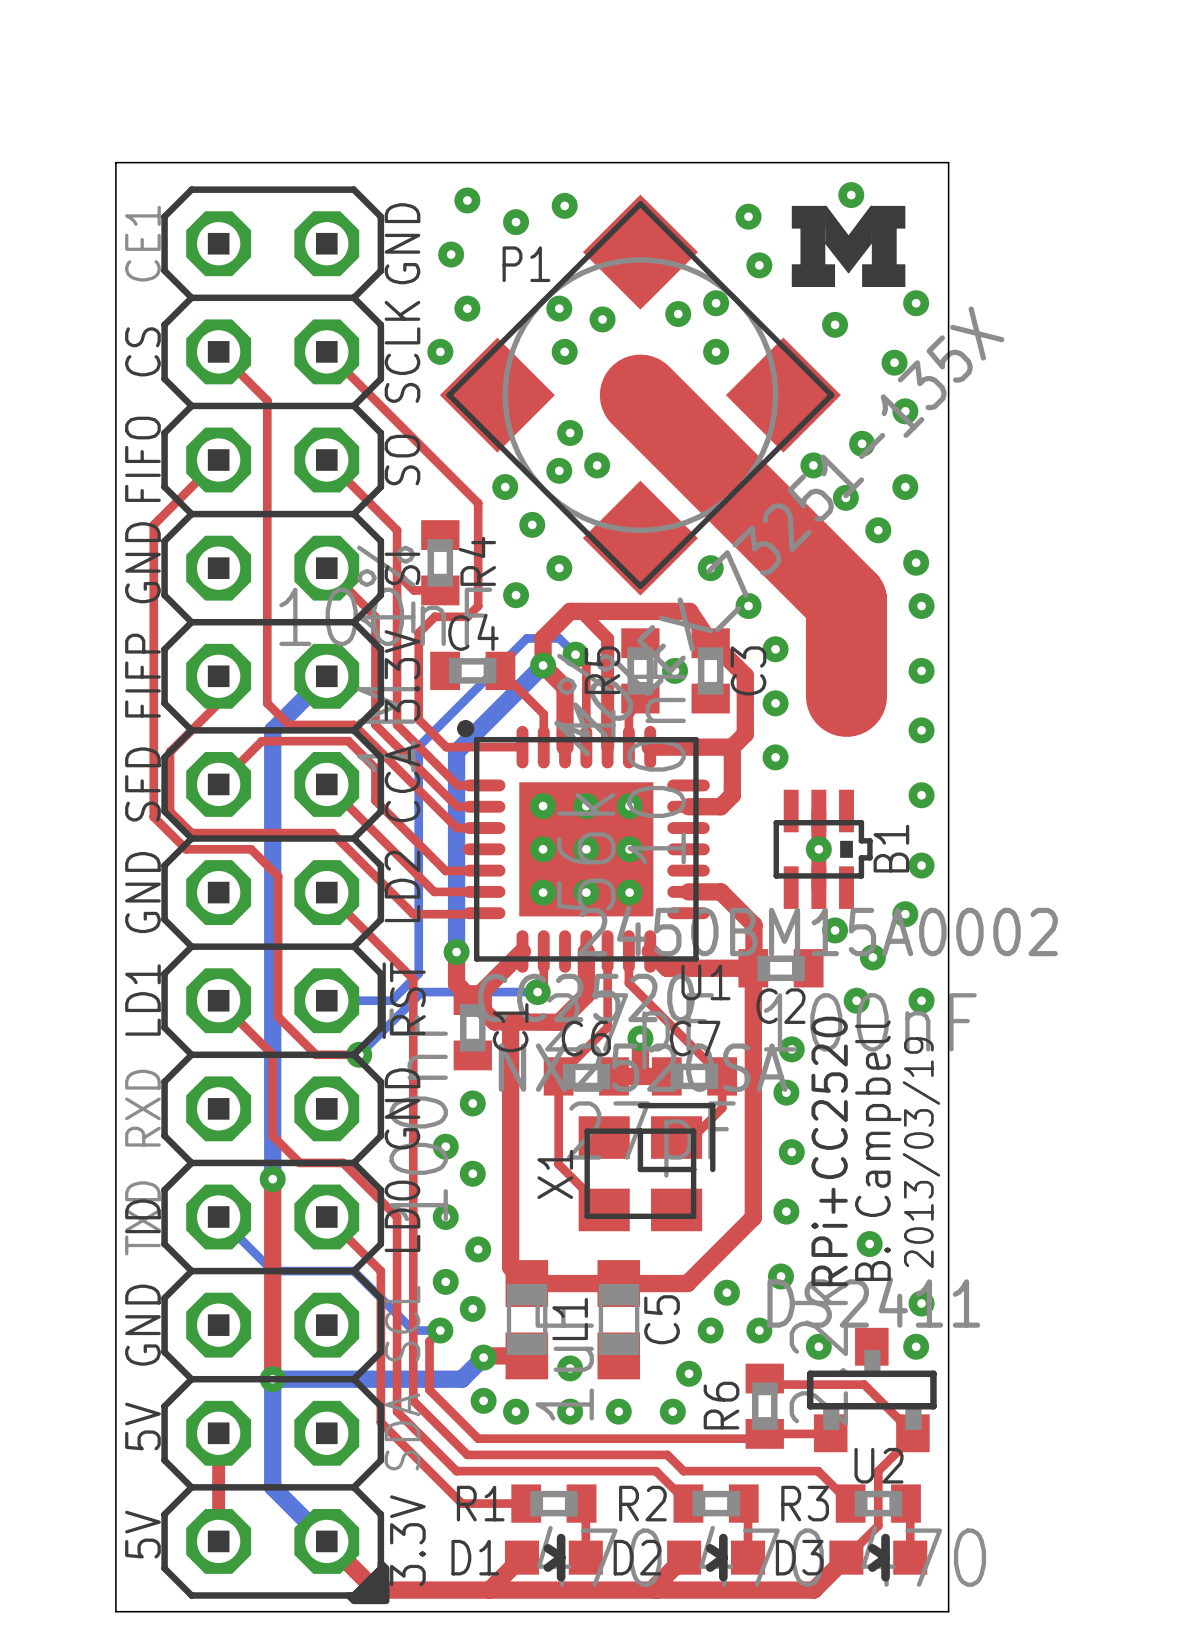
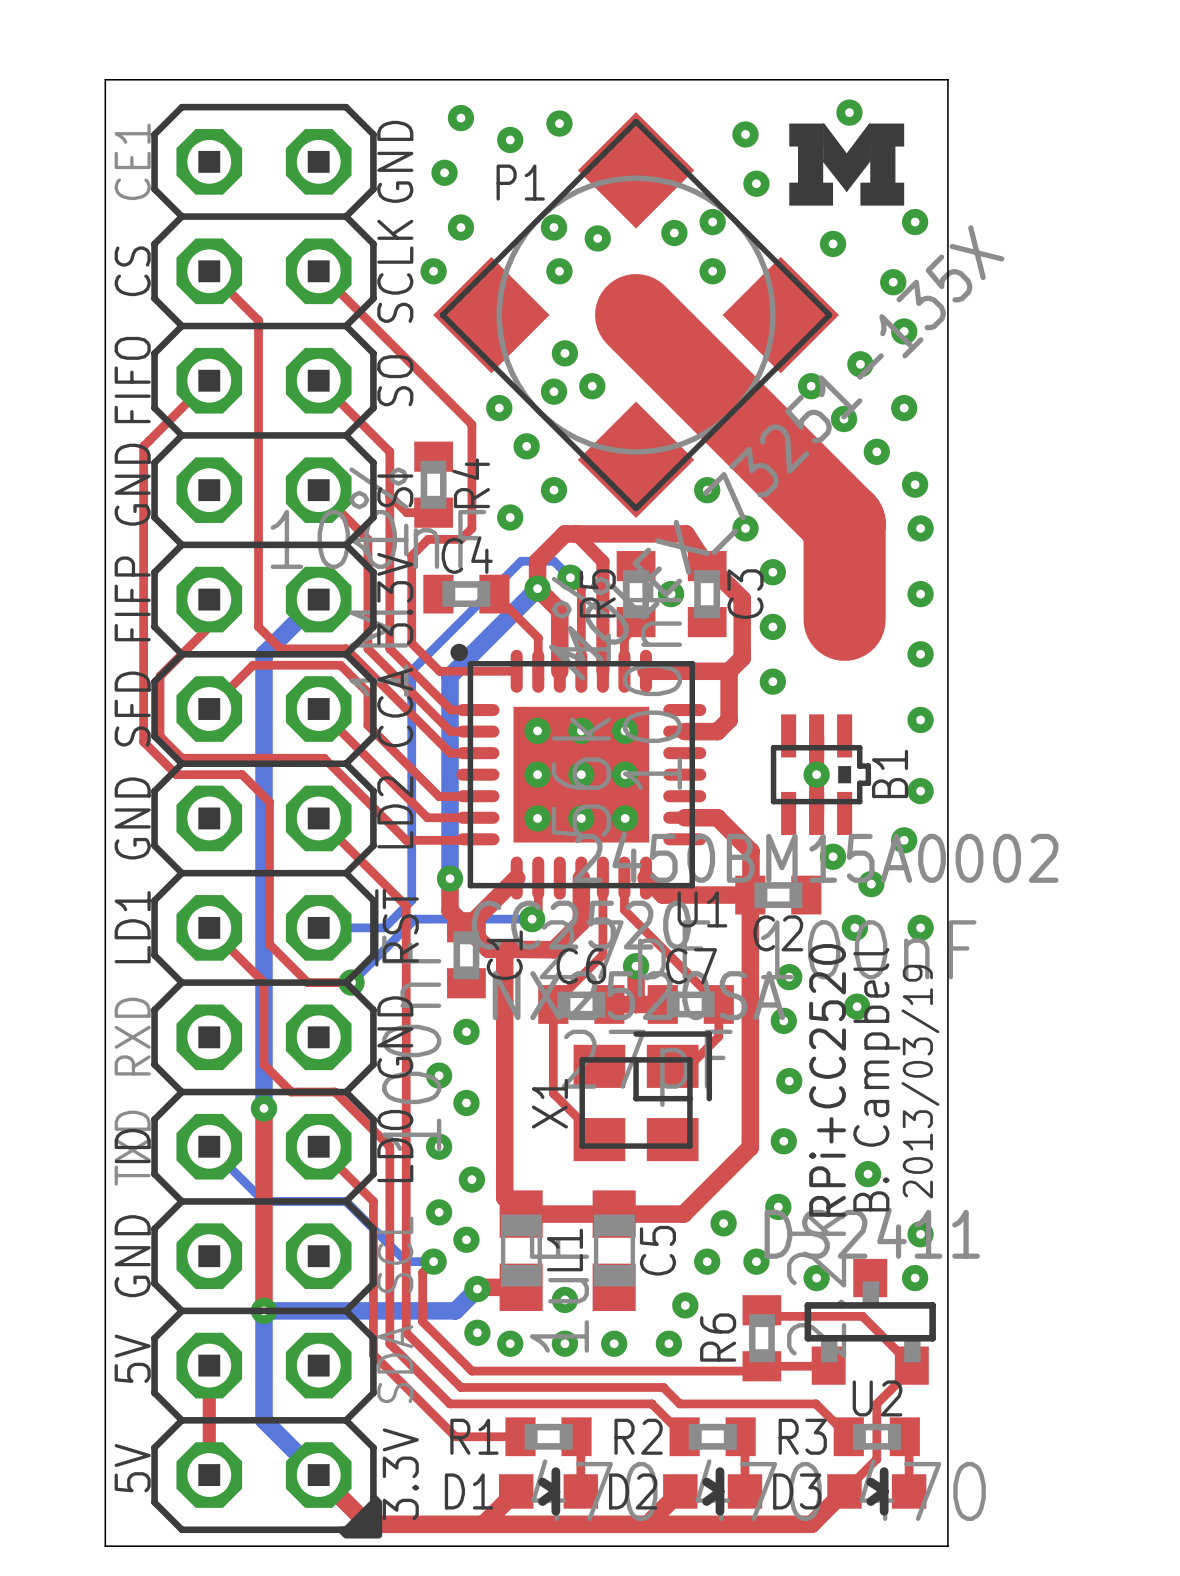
via: none -> (857, 1006)

